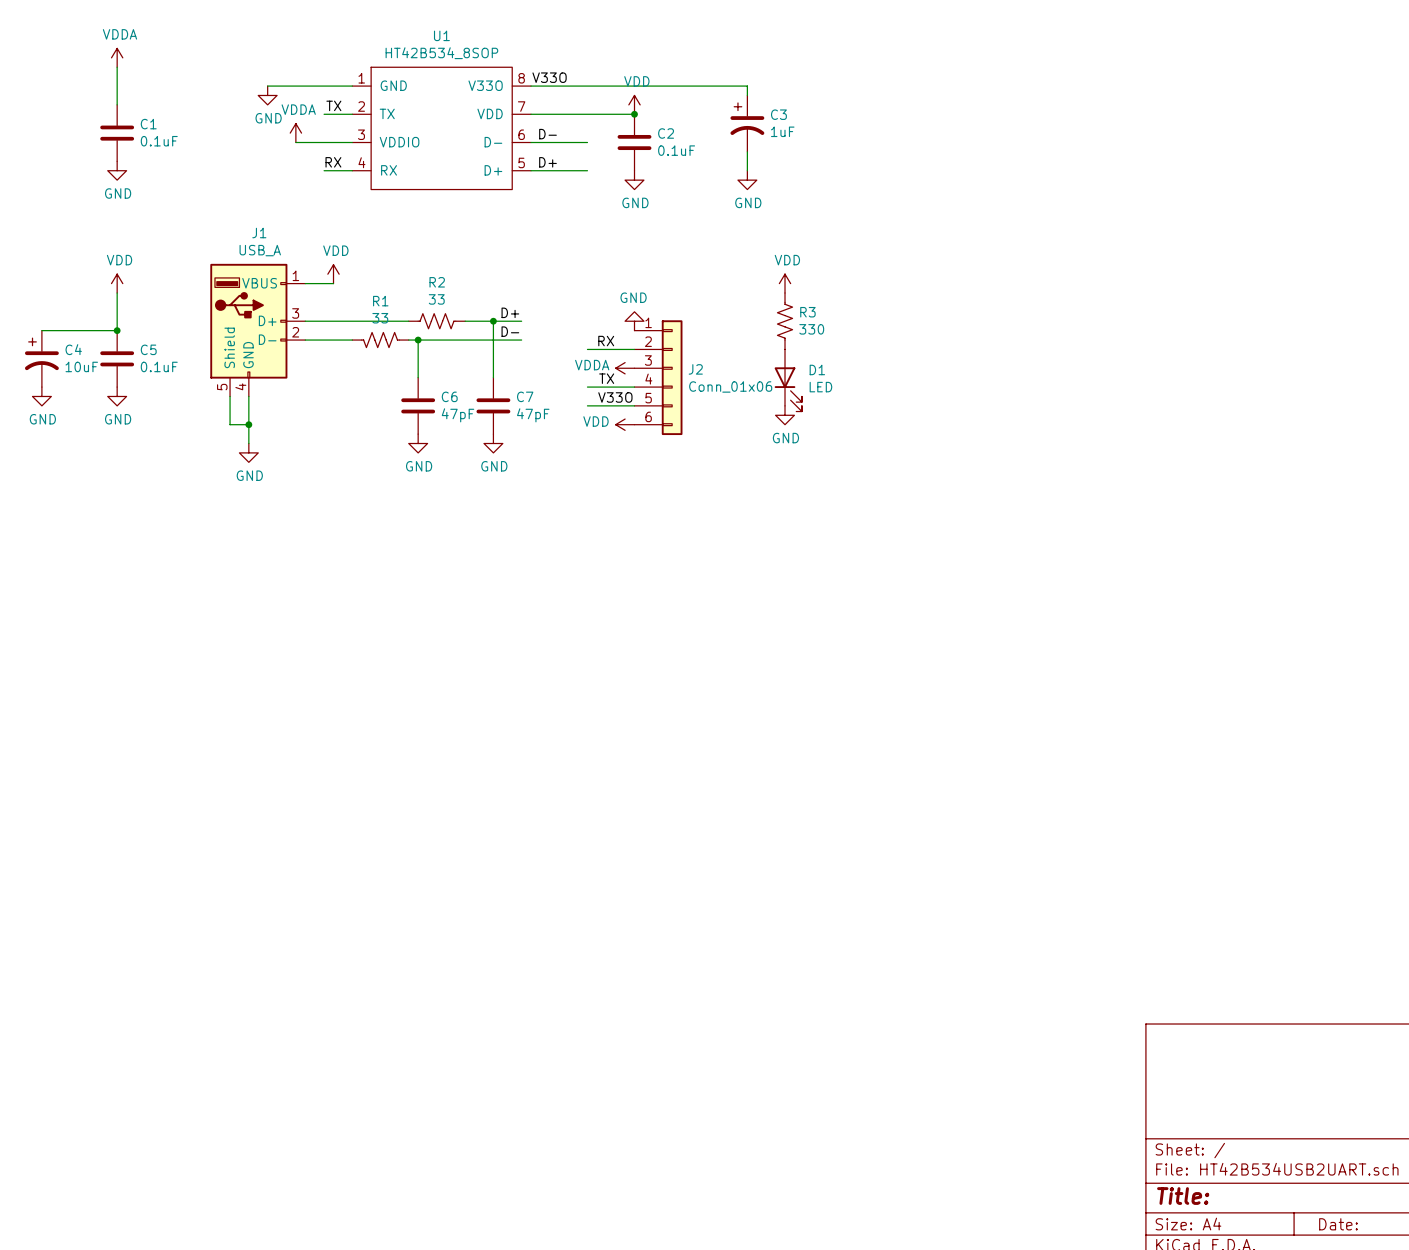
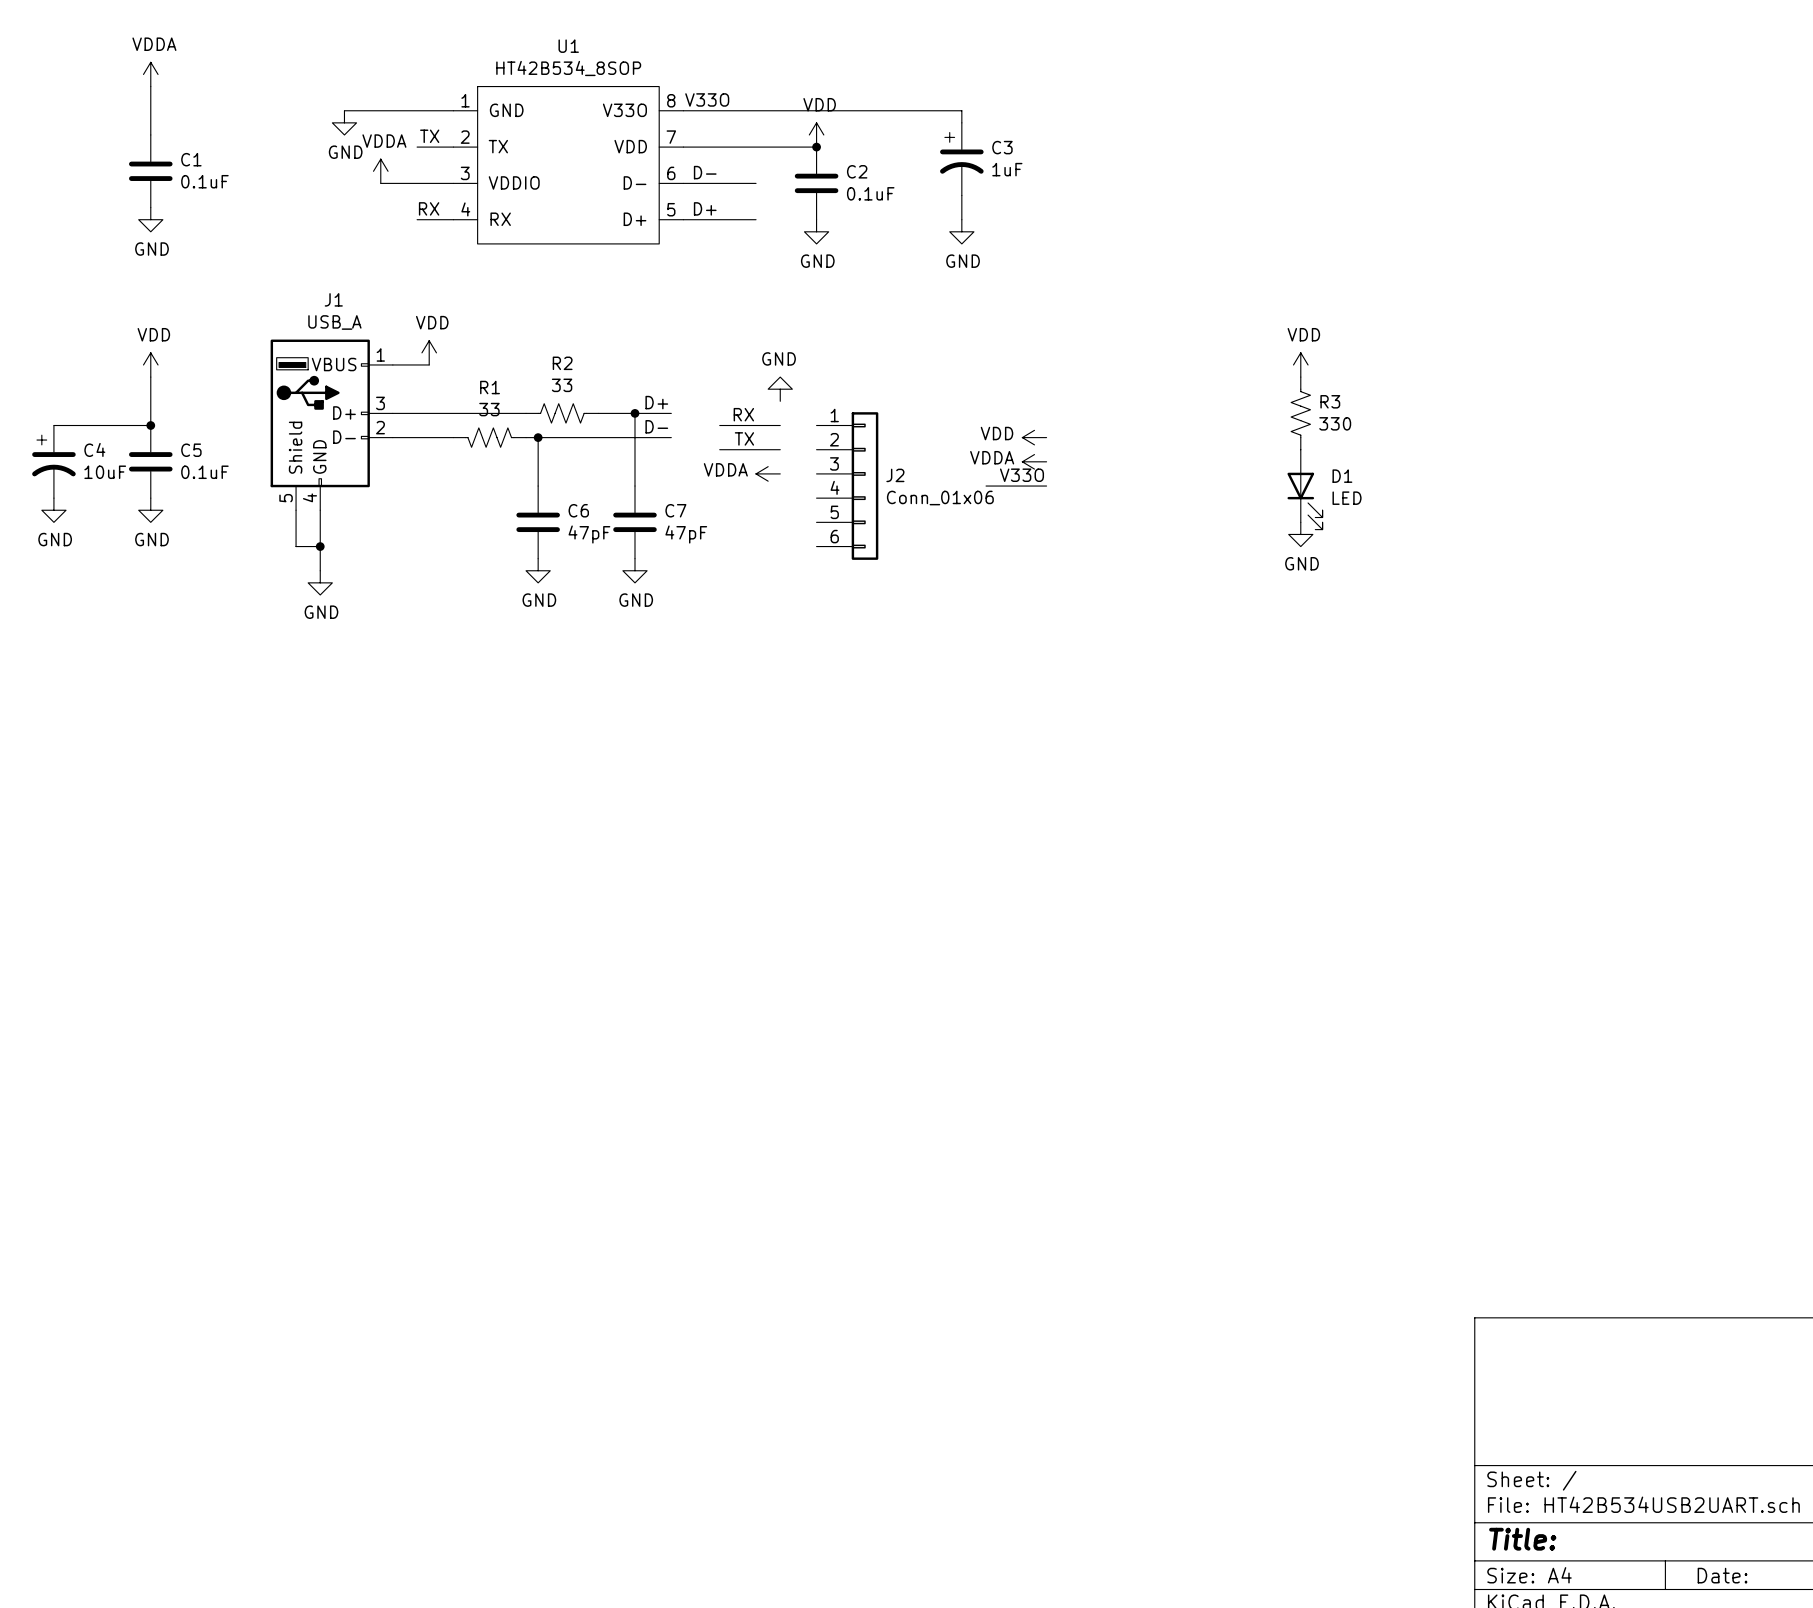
power symbol rotation: 0° (785, 283) -> 90° counterclockwise (1034, 437)
power symbol position: VDD (785, 283) -> VDD (1034, 437)
power symbol: none -> VDD (1300, 364)
power symbol position: GND (634, 321) -> GND (780, 389)
R3 position: (785, 321) -> (1300, 413)
label position: RX (606, 341) -> RX (743, 414)
wire: (606, 349) (634, 349) -> (719, 449) (756, 449)
power symbol: none -> VDDA (1034, 461)
power symbol position: VDDA (625, 368) -> VDDA (768, 473)
label position: TX (606, 378) -> TX (744, 438)
D1 position: (788, 380) -> (1305, 489)
wire: (587, 387) (634, 387) -> (719, 425) (780, 425)
label position: V33O (615, 397) -> V33O (1021, 475)
wire: (587, 405) (634, 405) -> (986, 486) (1046, 486)
power symbol: GND (785, 415) -> none
power symbol: none -> GND (1300, 534)
power symbol: VDD (625, 424) -> none

